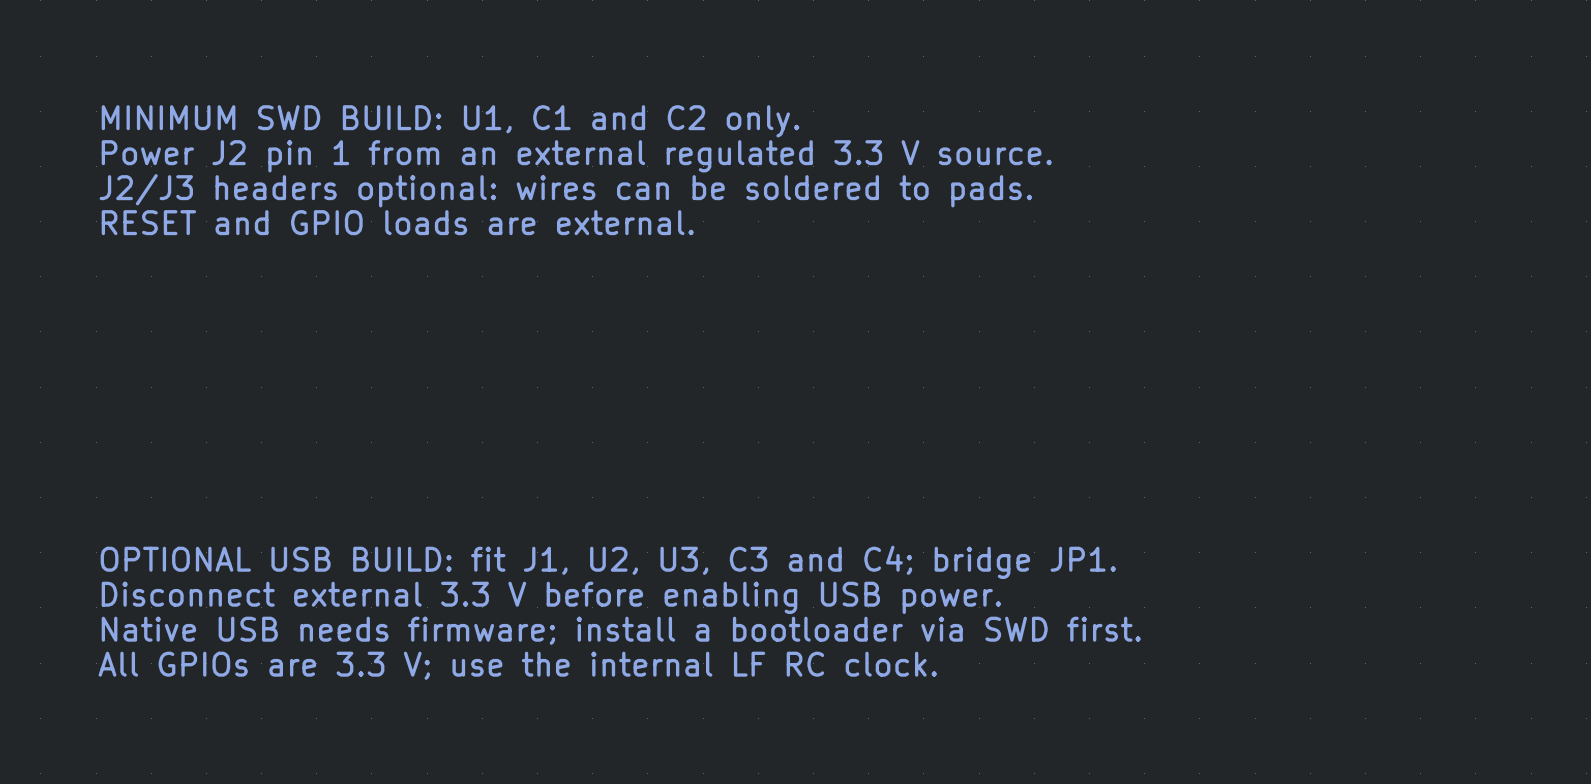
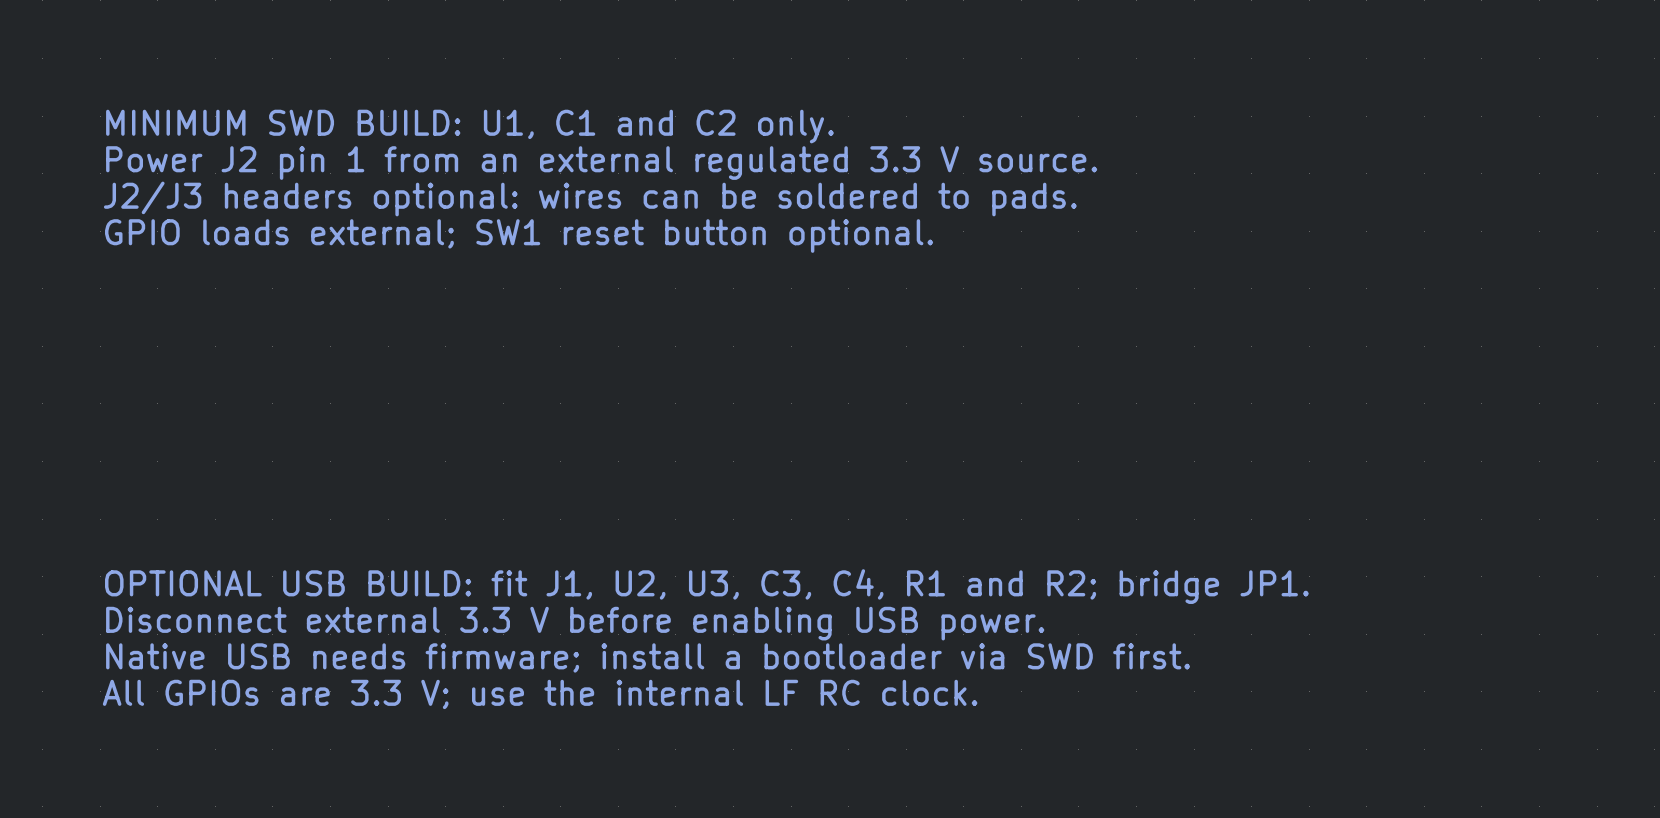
text: RESET and GPIO loads are external. (397, 222) -> GPIO loads external; SW1 reset button optional. (519, 236)
text: OPTIONAL USB BUILD: fit J1, U2, U3, C3 and C4; bridge JP1. (608, 562) -> OPTIONAL USB BUILD: fit J1, U2, U3, C3, C4, R1 and R2; bridge JP1. (706, 586)

